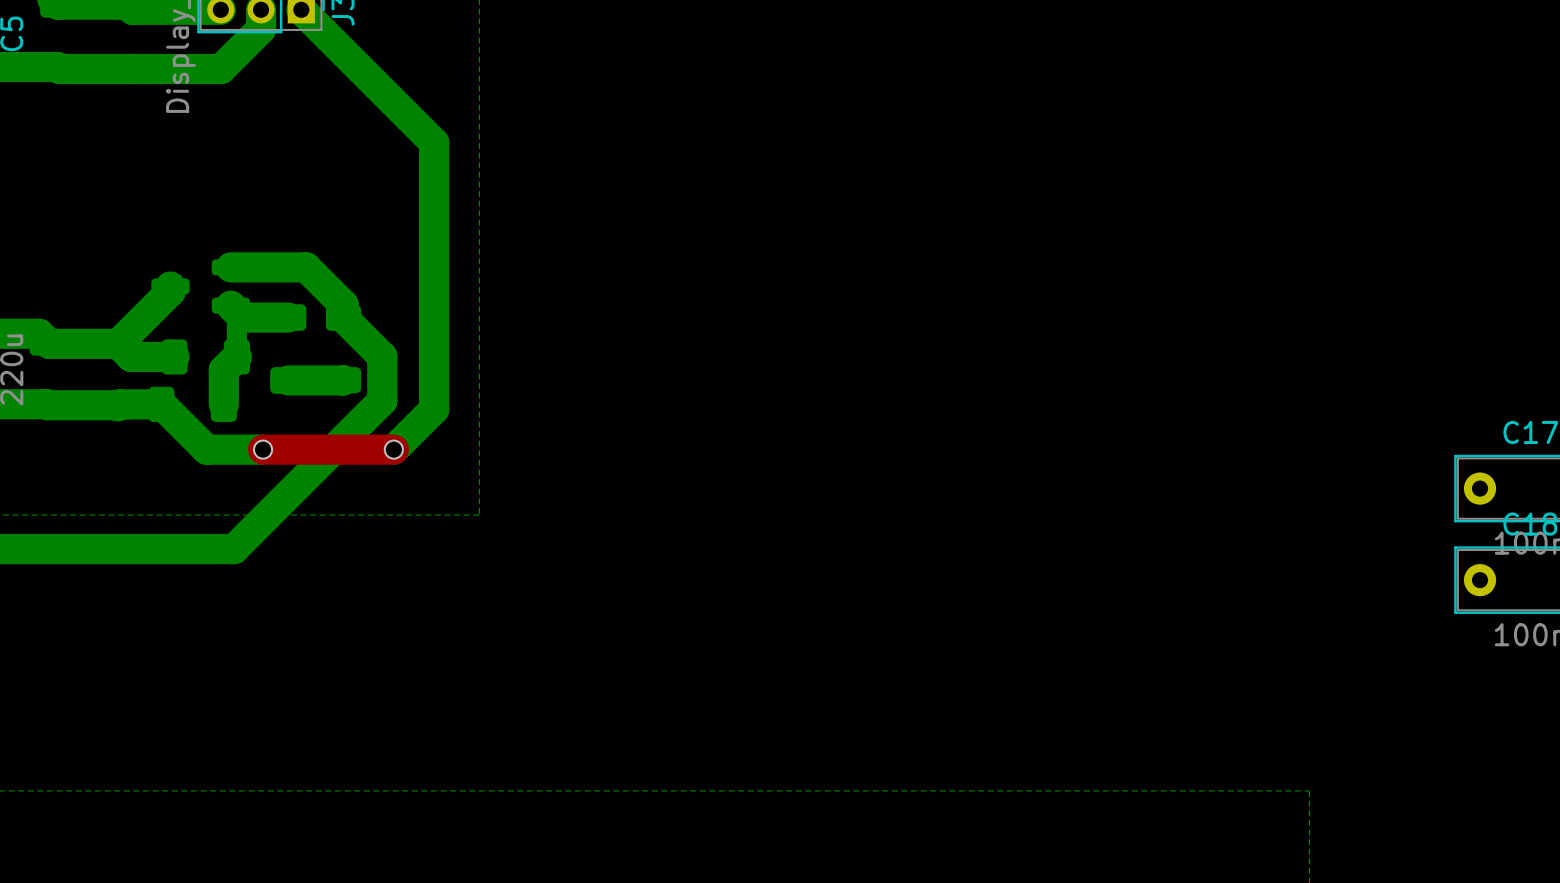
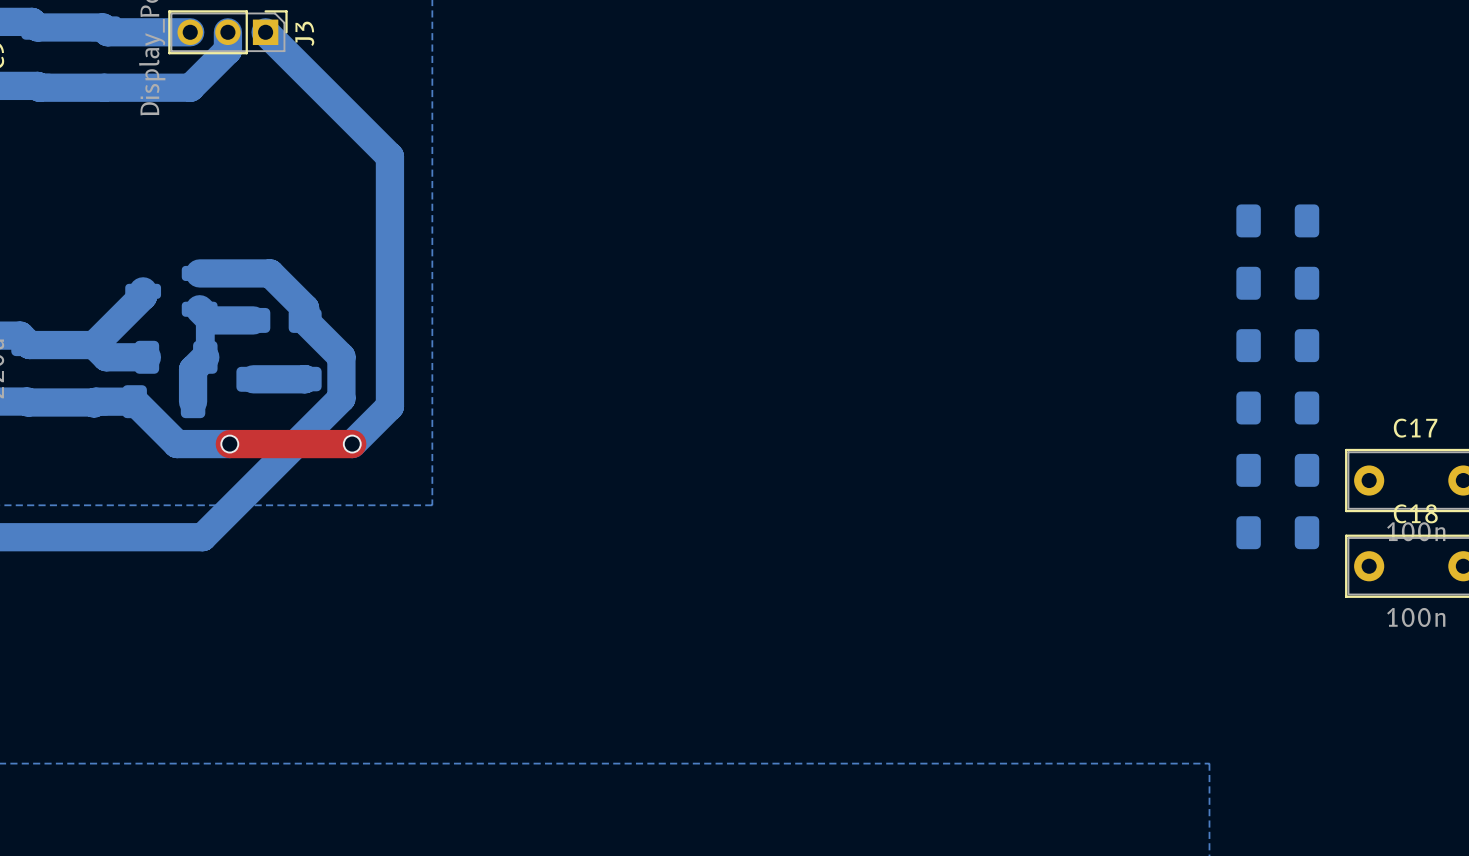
part: none -> (1277, 220)
part: none -> (1277, 283)
part: none -> (1277, 345)
part: none -> (1277, 407)
part: none -> (1277, 470)
part: none -> (1277, 532)

